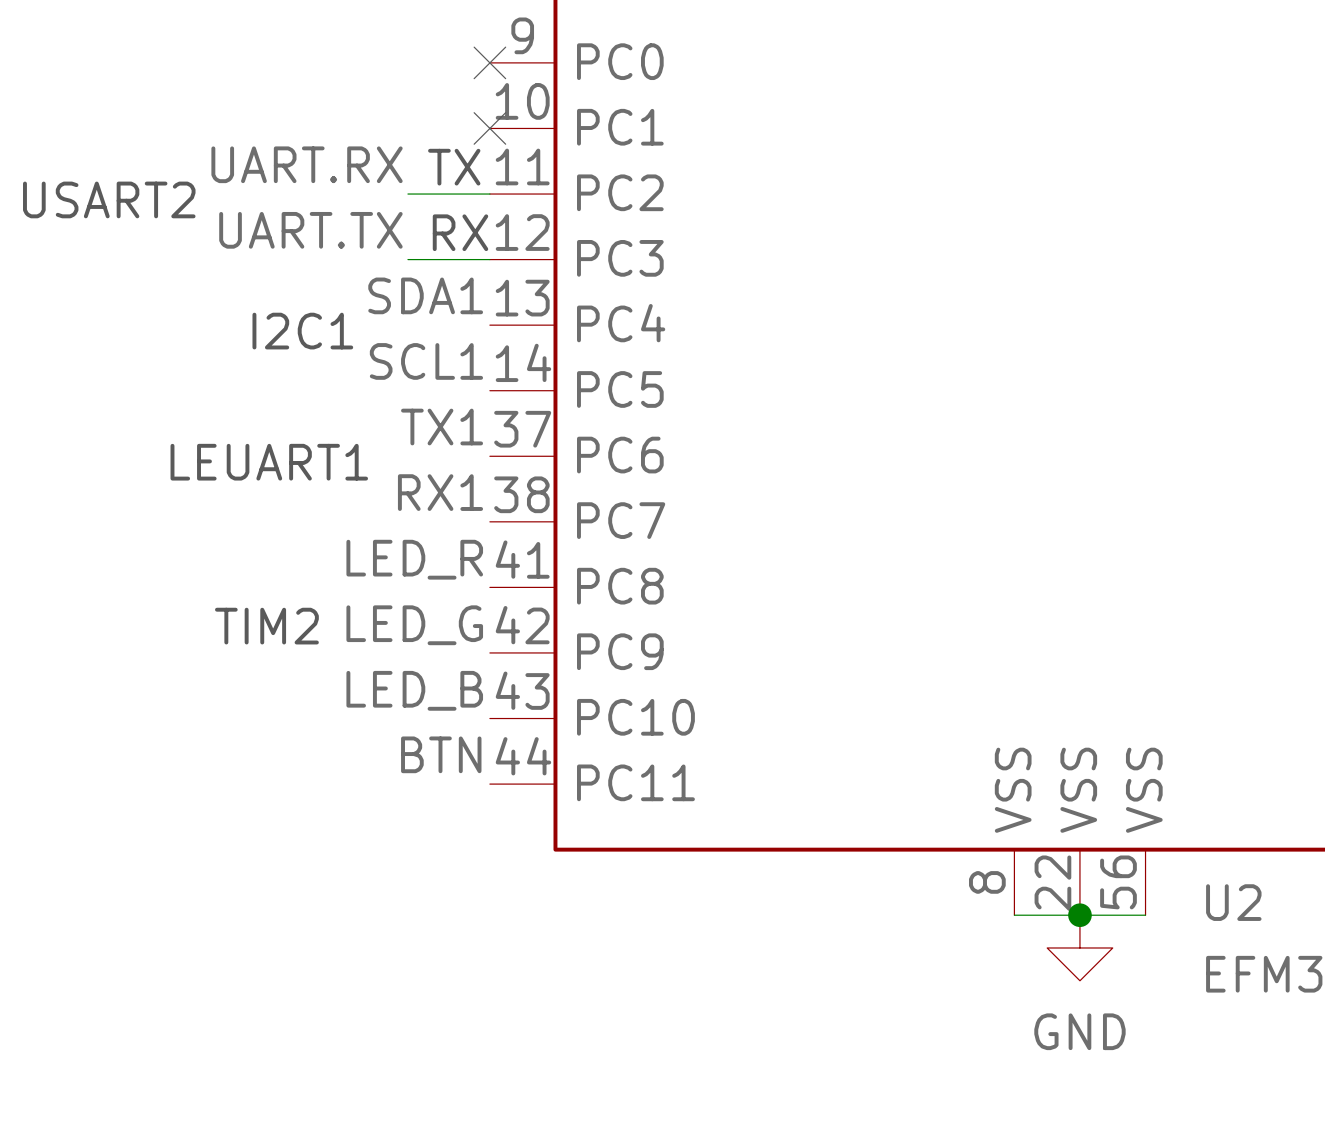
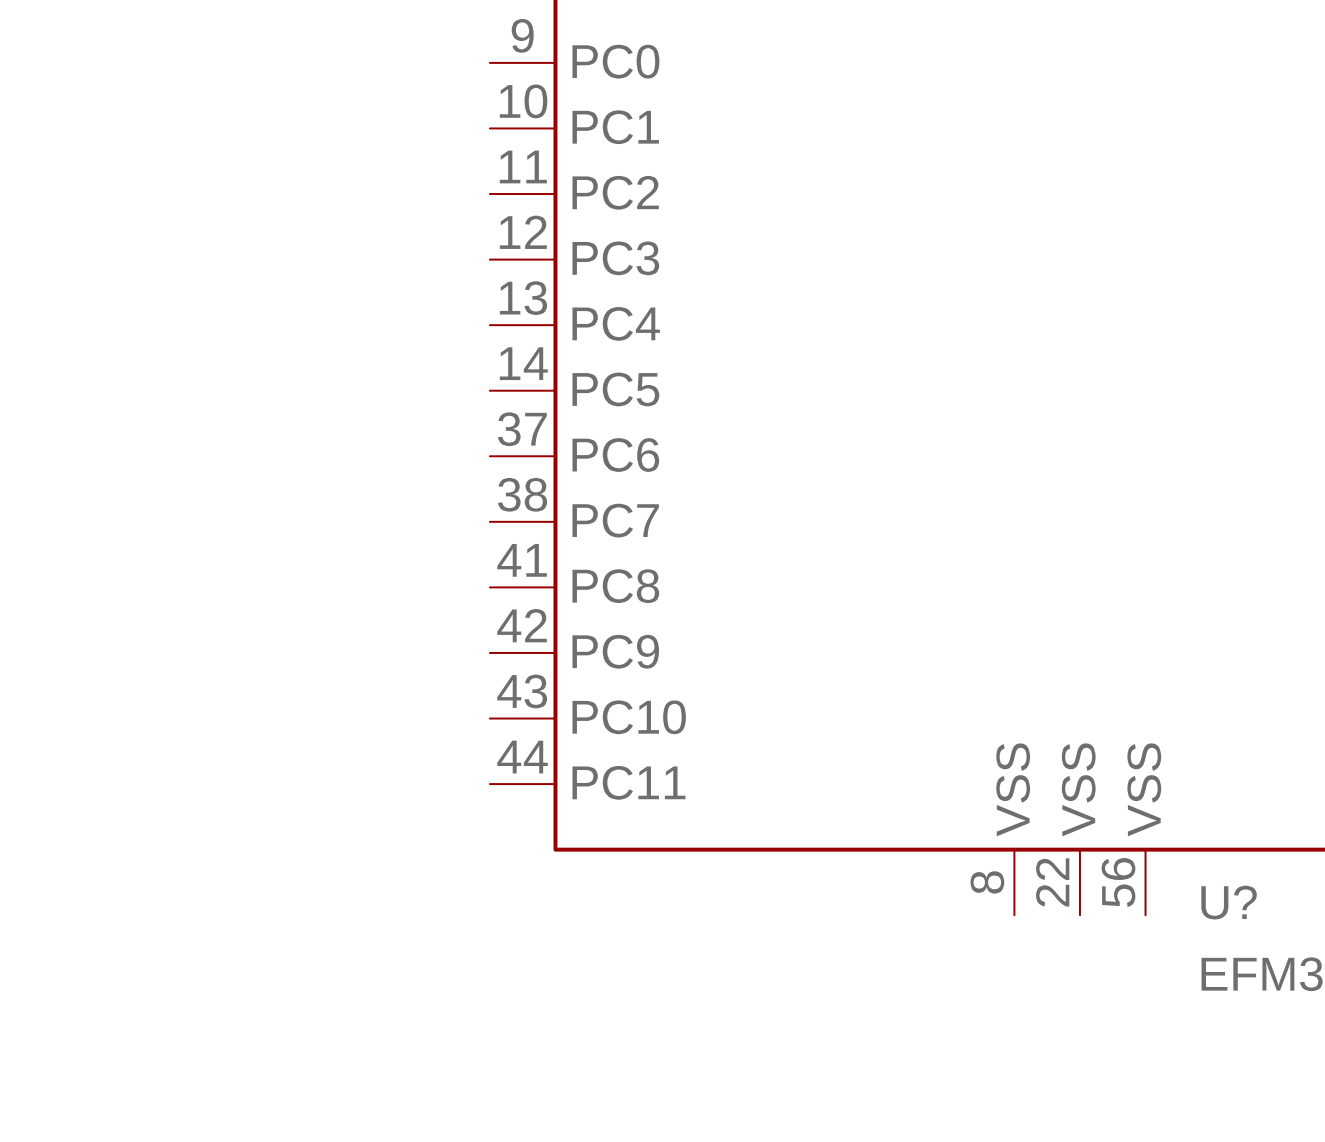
no-connect mark: (489, 62) -> none
no-connect mark: (489, 128) -> none
label: UART.RX (307, 164) -> none
text: TX (454, 167) -> none
wire: (407, 194) (489, 194) -> none
text: USART2 (109, 199) -> none
label: UART.TX (310, 230) -> none
text: RX (460, 232) -> none
wire: (407, 259) (489, 259) -> none
label: SDA1 (425, 295) -> none
text: I2C1 (302, 331) -> none
label: SCL1 (426, 361) -> none
label: TX1 (442, 427) -> none
text: LEUART1 (269, 462) -> none
label: RX1 (440, 492) -> none
label: LED_R (414, 559) -> none
label: LED_G (414, 625) -> none
text: TIM2 (266, 626) -> none
label: LED_B (414, 690) -> none
label: BTN (441, 754) -> none
U2 name: U2 (1233, 902) -> U? (1229, 902)
wire: (1014, 915) (1145, 915) -> none
junction: (1079, 915) -> none
power symbol: GND (1079, 947) -> none

